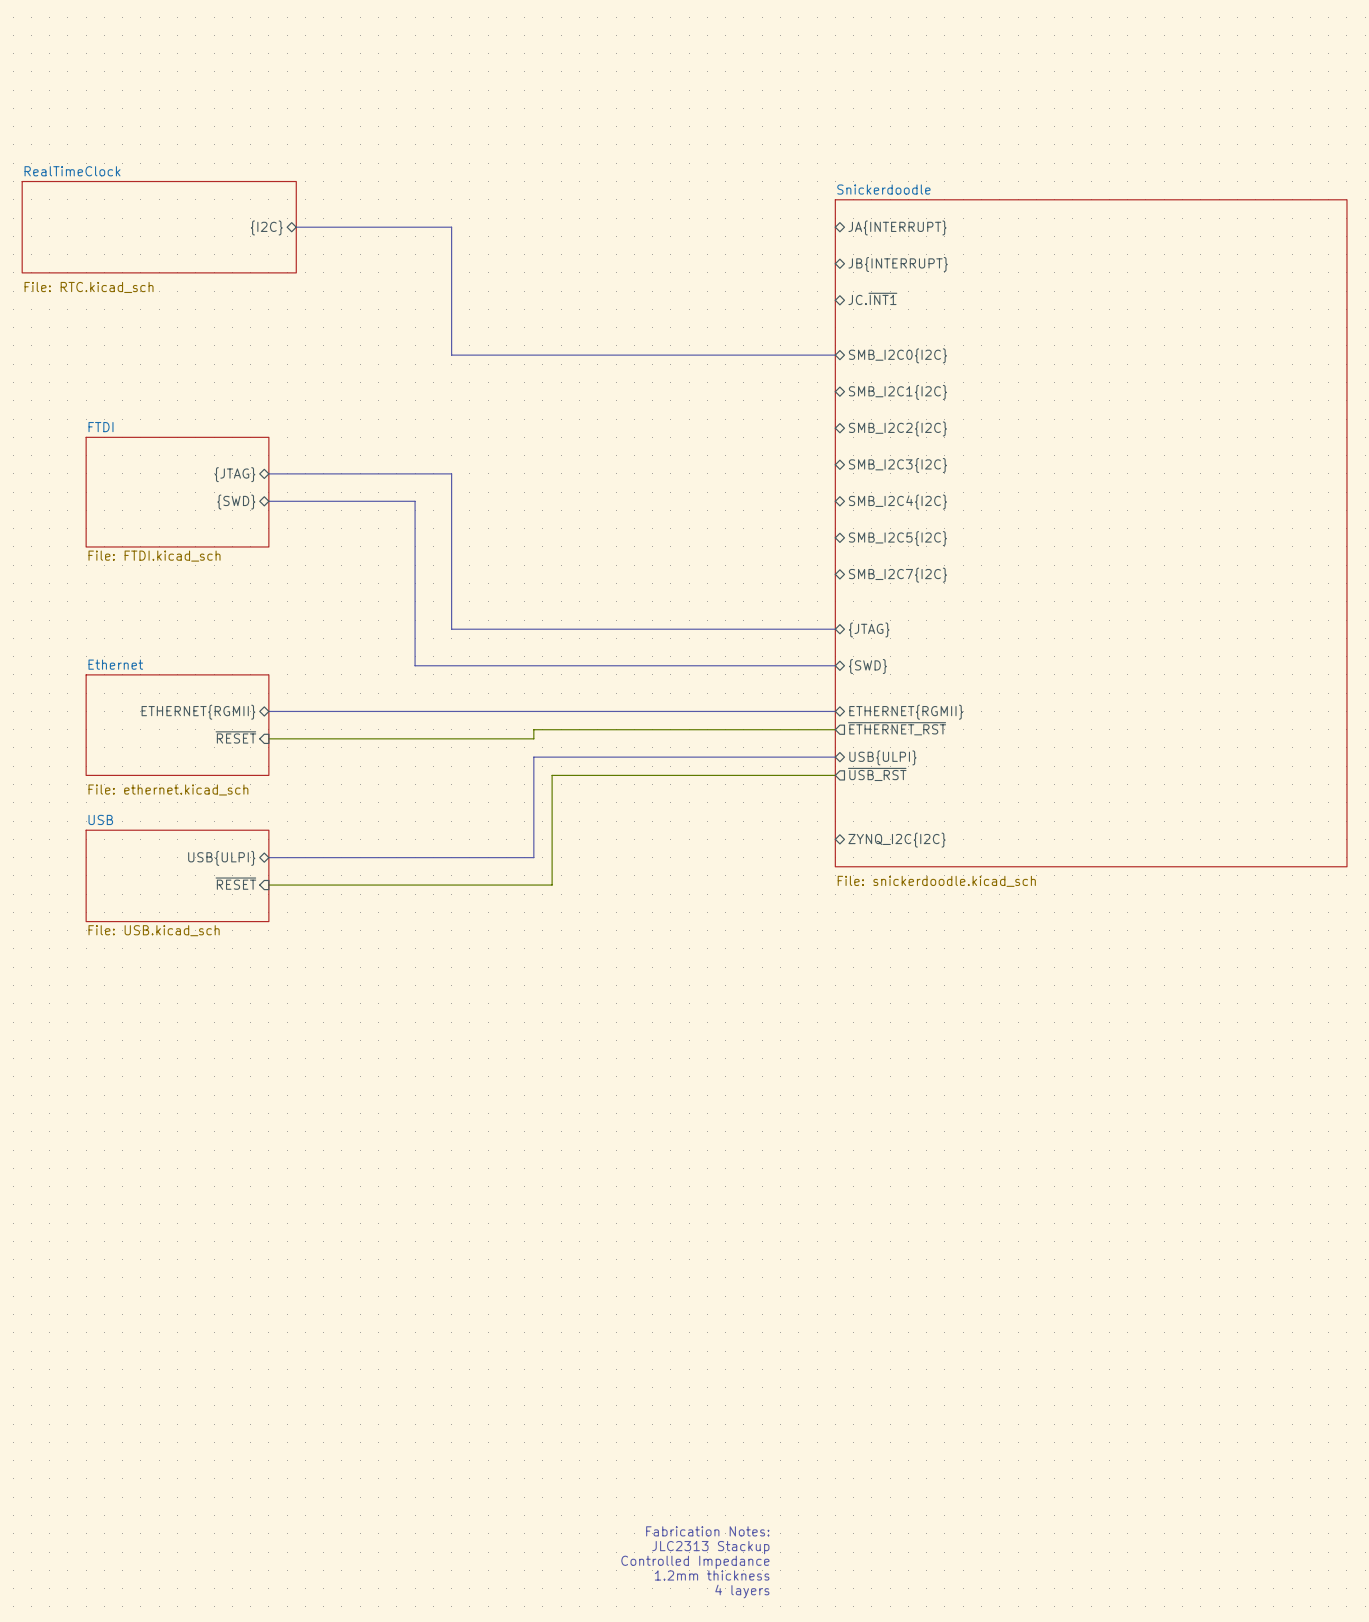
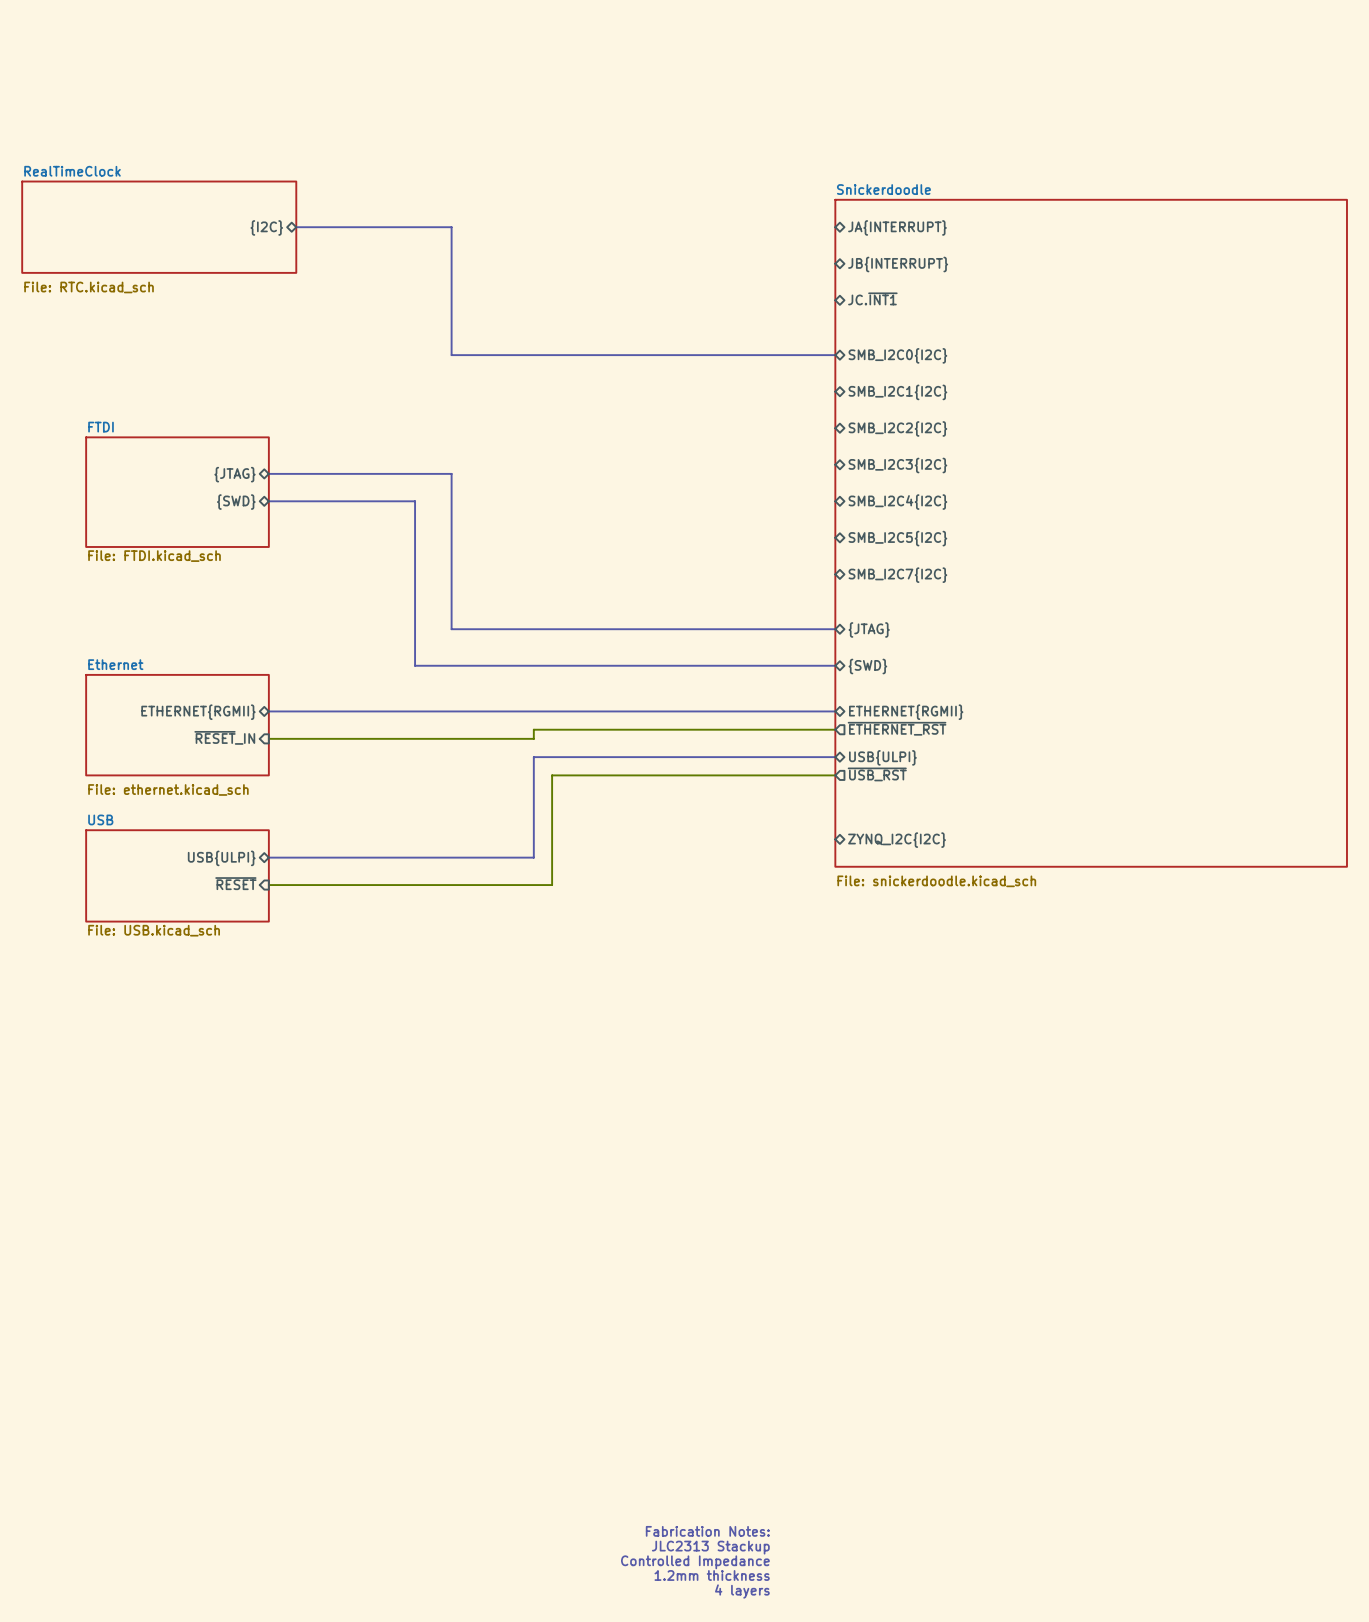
sheet pin: ~{RESET} (235, 737) -> ~{RESET}_IN (224, 737)

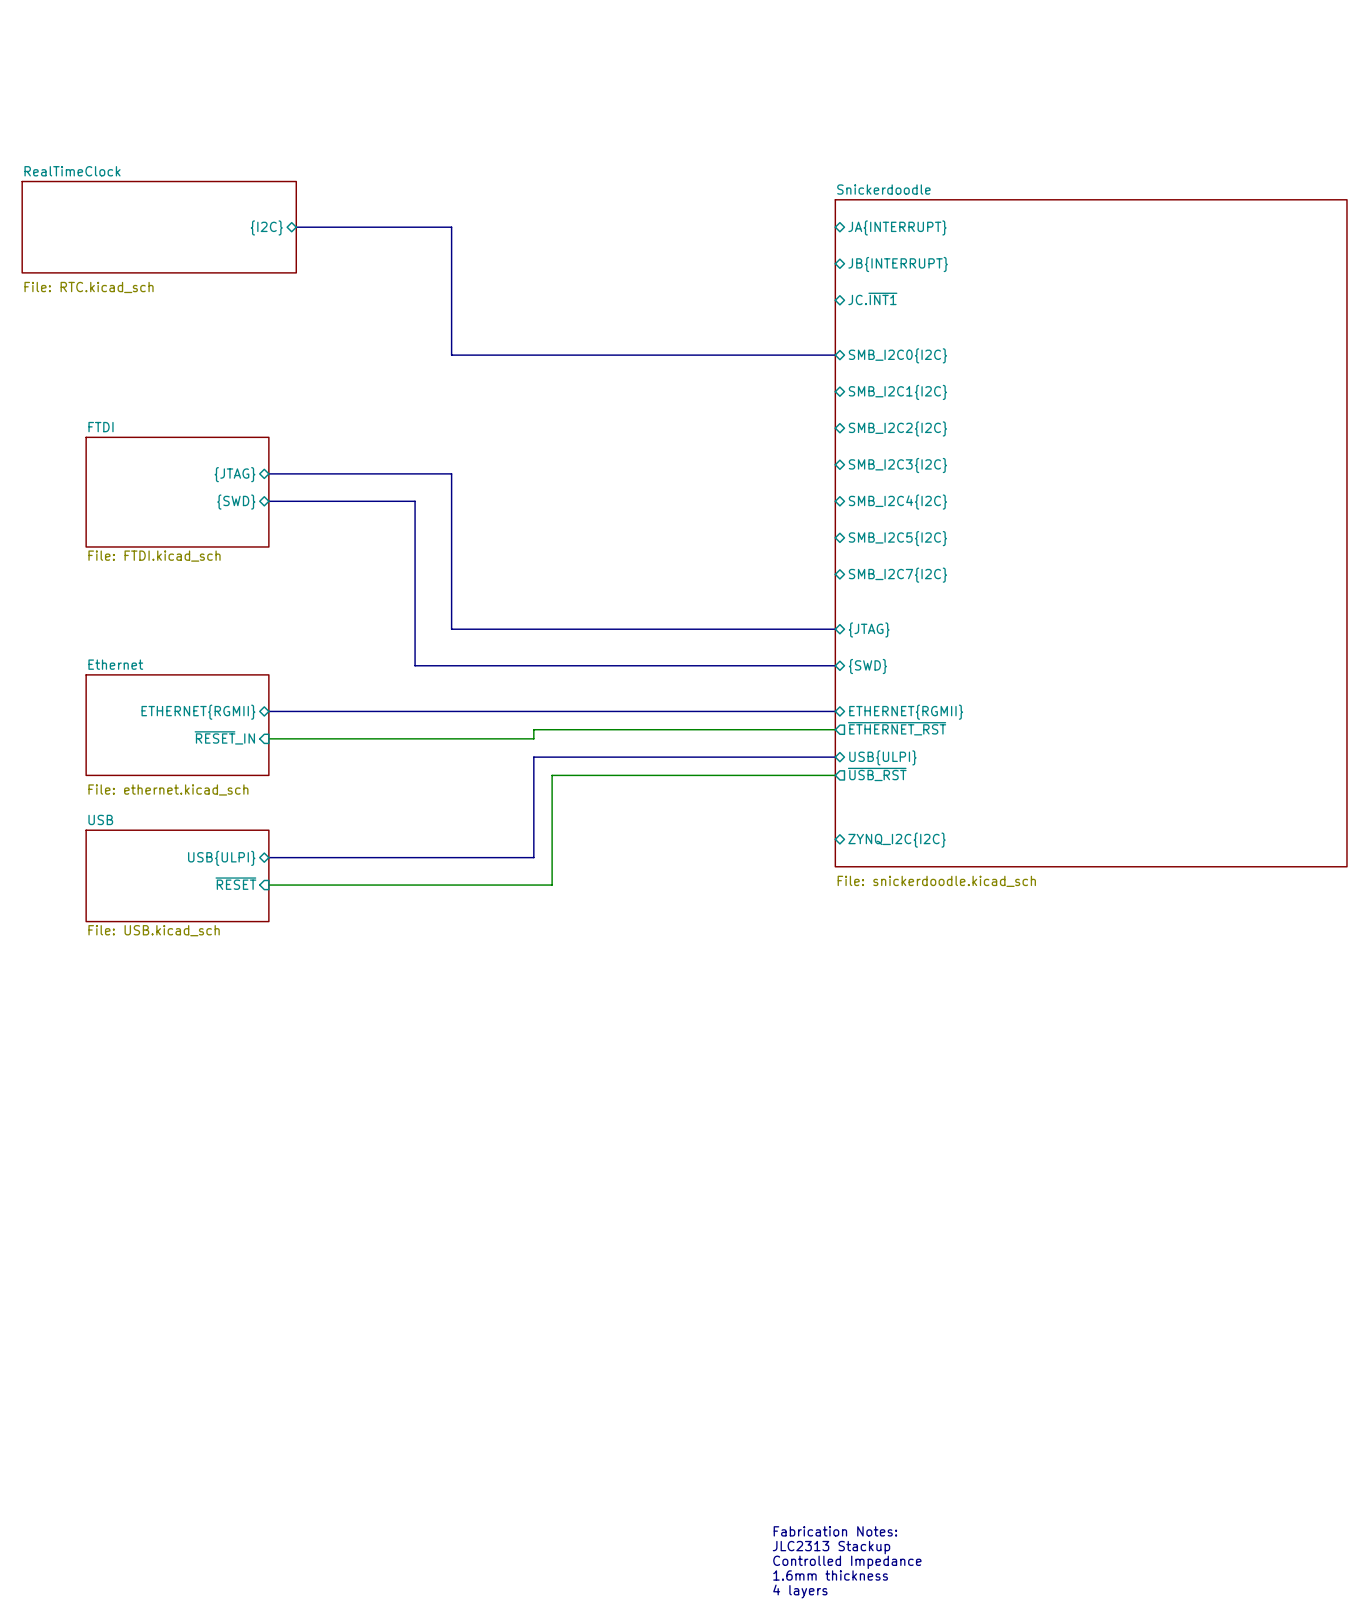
text position: Fabrication Notes: (707, 1531) -> Fabrication Notes: (835, 1531)
text position: JLC2313 Stackup (710, 1547) -> JLC2313 Stackup (831, 1547)
text position: Controlled Impedance (695, 1562) -> Controlled Impedance (847, 1562)
text: 1.2mm thickness (712, 1575) -> 1.6mm thickness (830, 1575)
text position: 4 layers (742, 1591) -> 4 layers (800, 1591)

